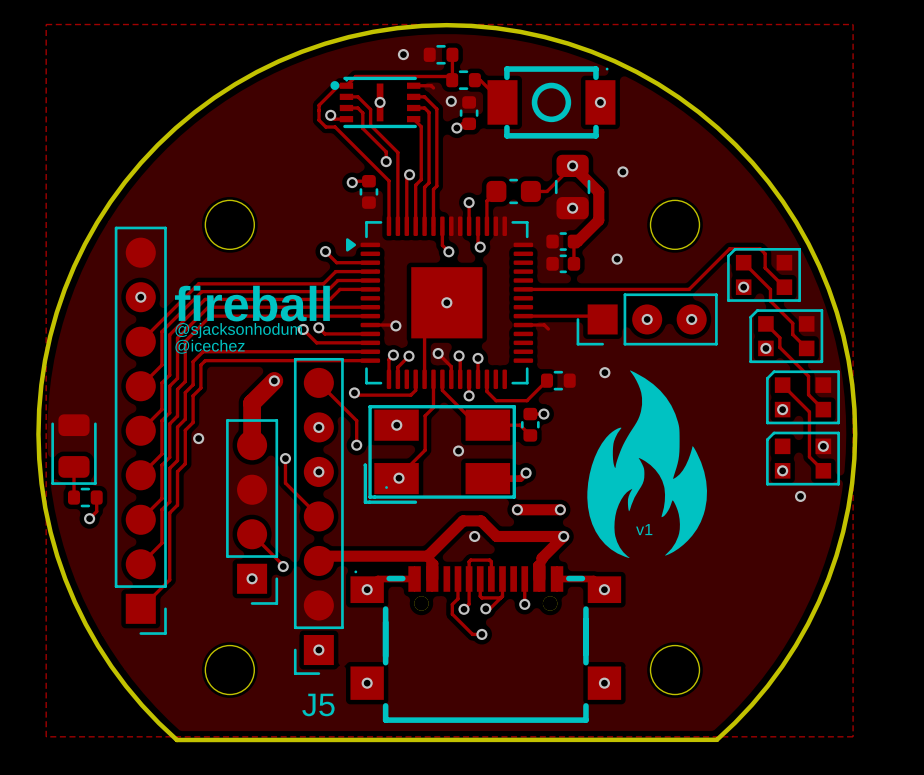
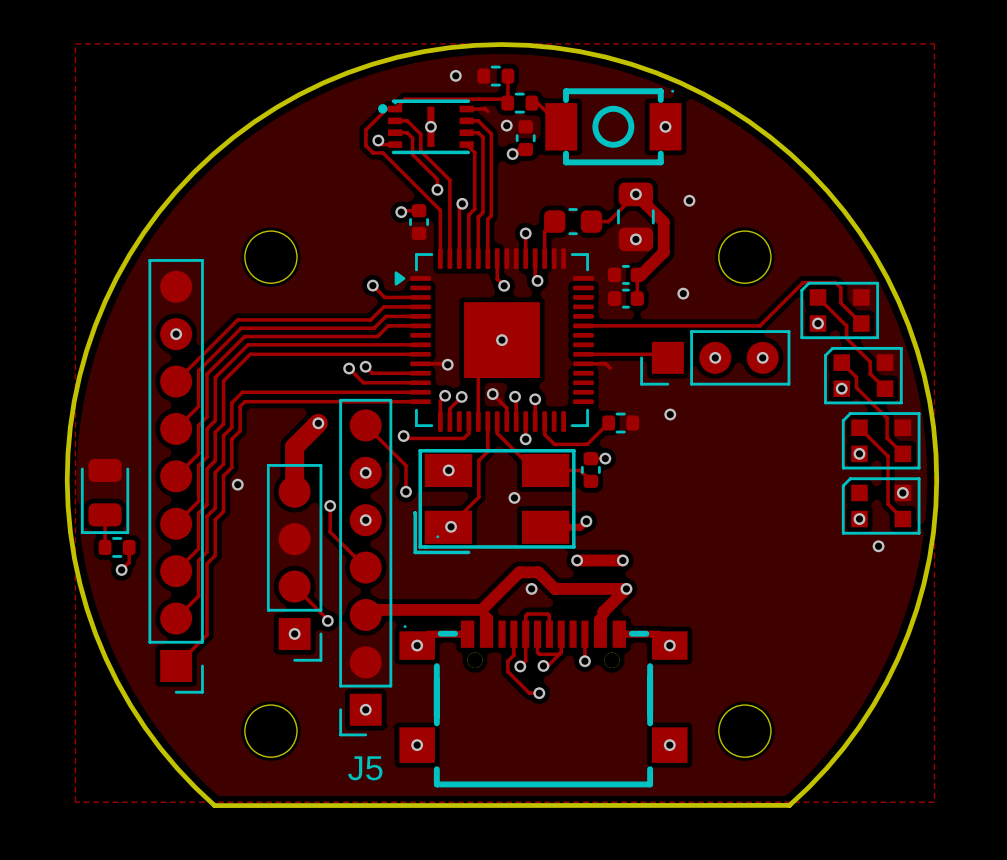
text: fireball (252, 303) -> none
text: @sjacksonhodum (238, 330) -> none
text: @icechez (210, 346) -> none
drawing: [587, 370, 708, 559] -> none
text: v1 (644, 529) -> none

